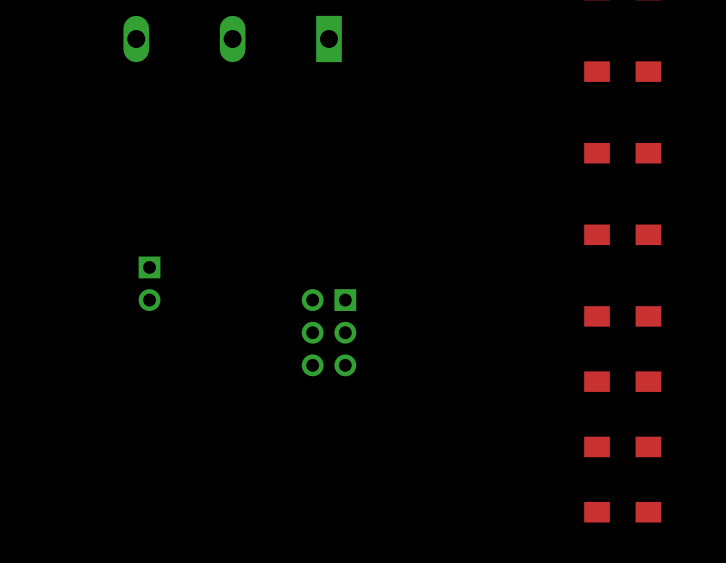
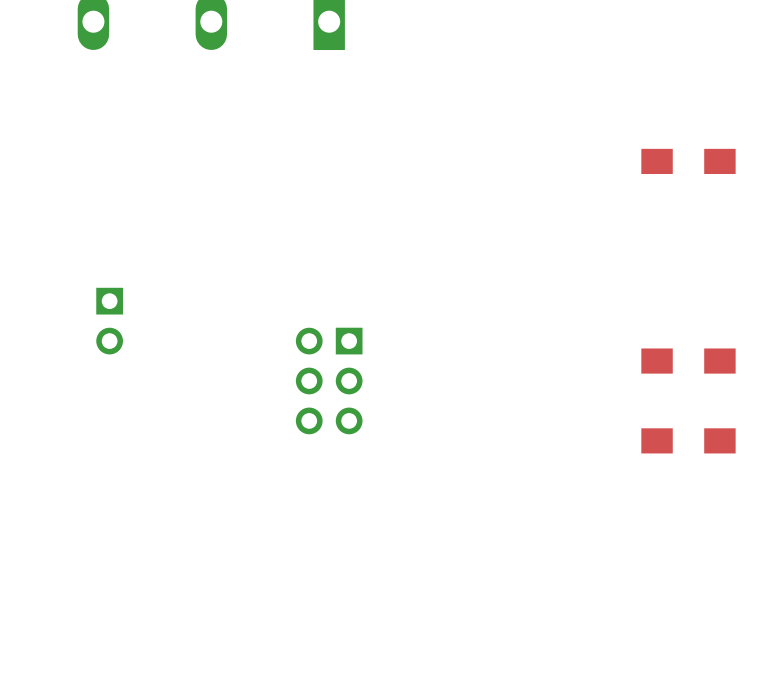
part: (622, 71) -> none
part: (622, 234) -> none
part: (622, 446) -> none
part: (622, 512) -> none

